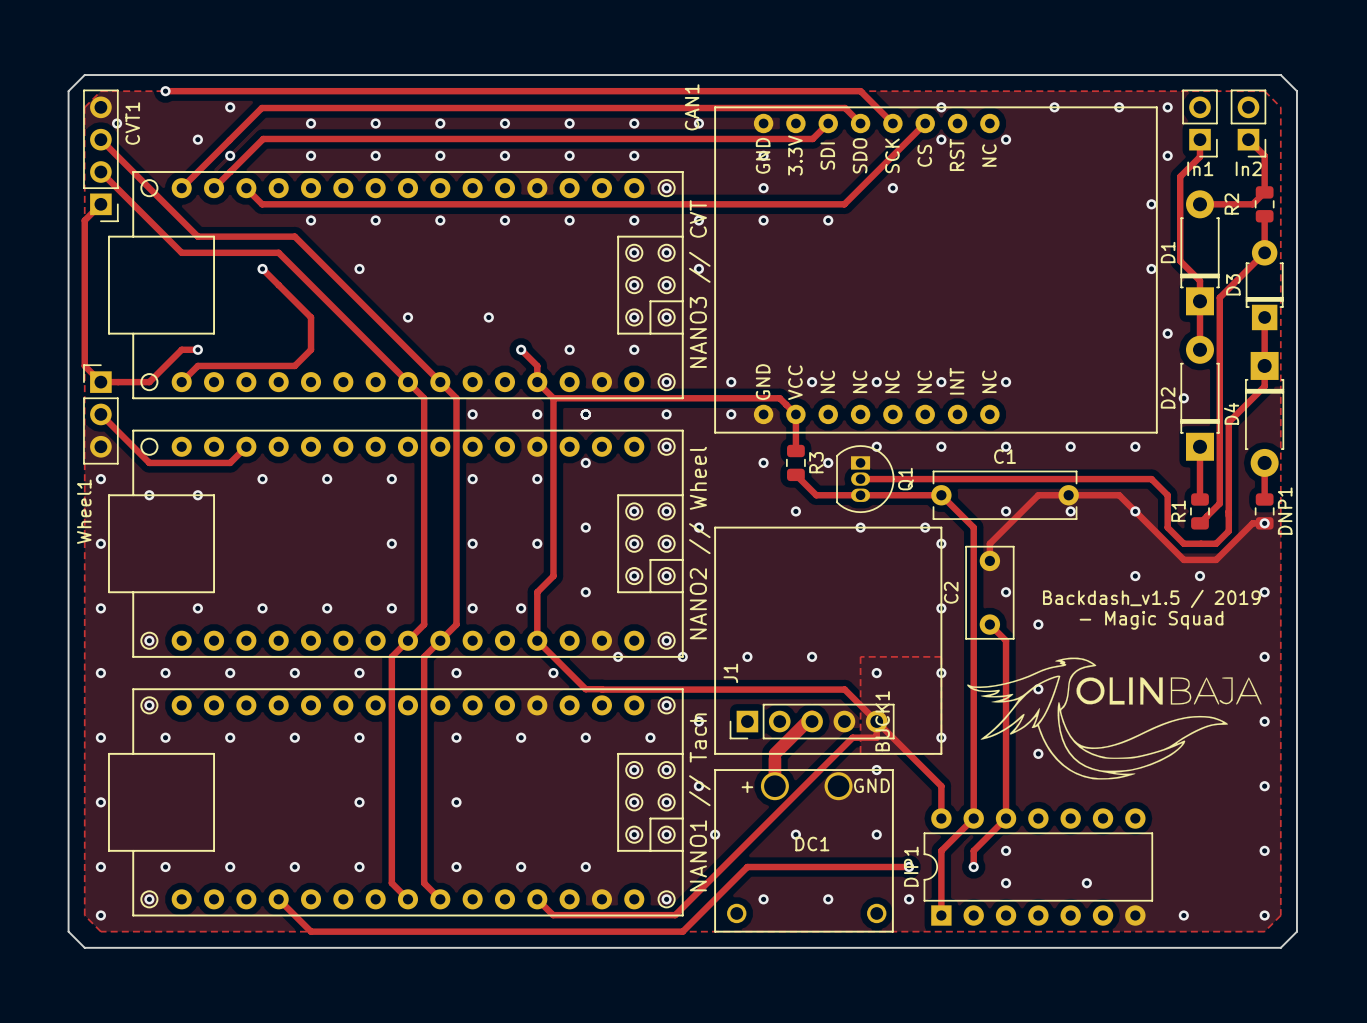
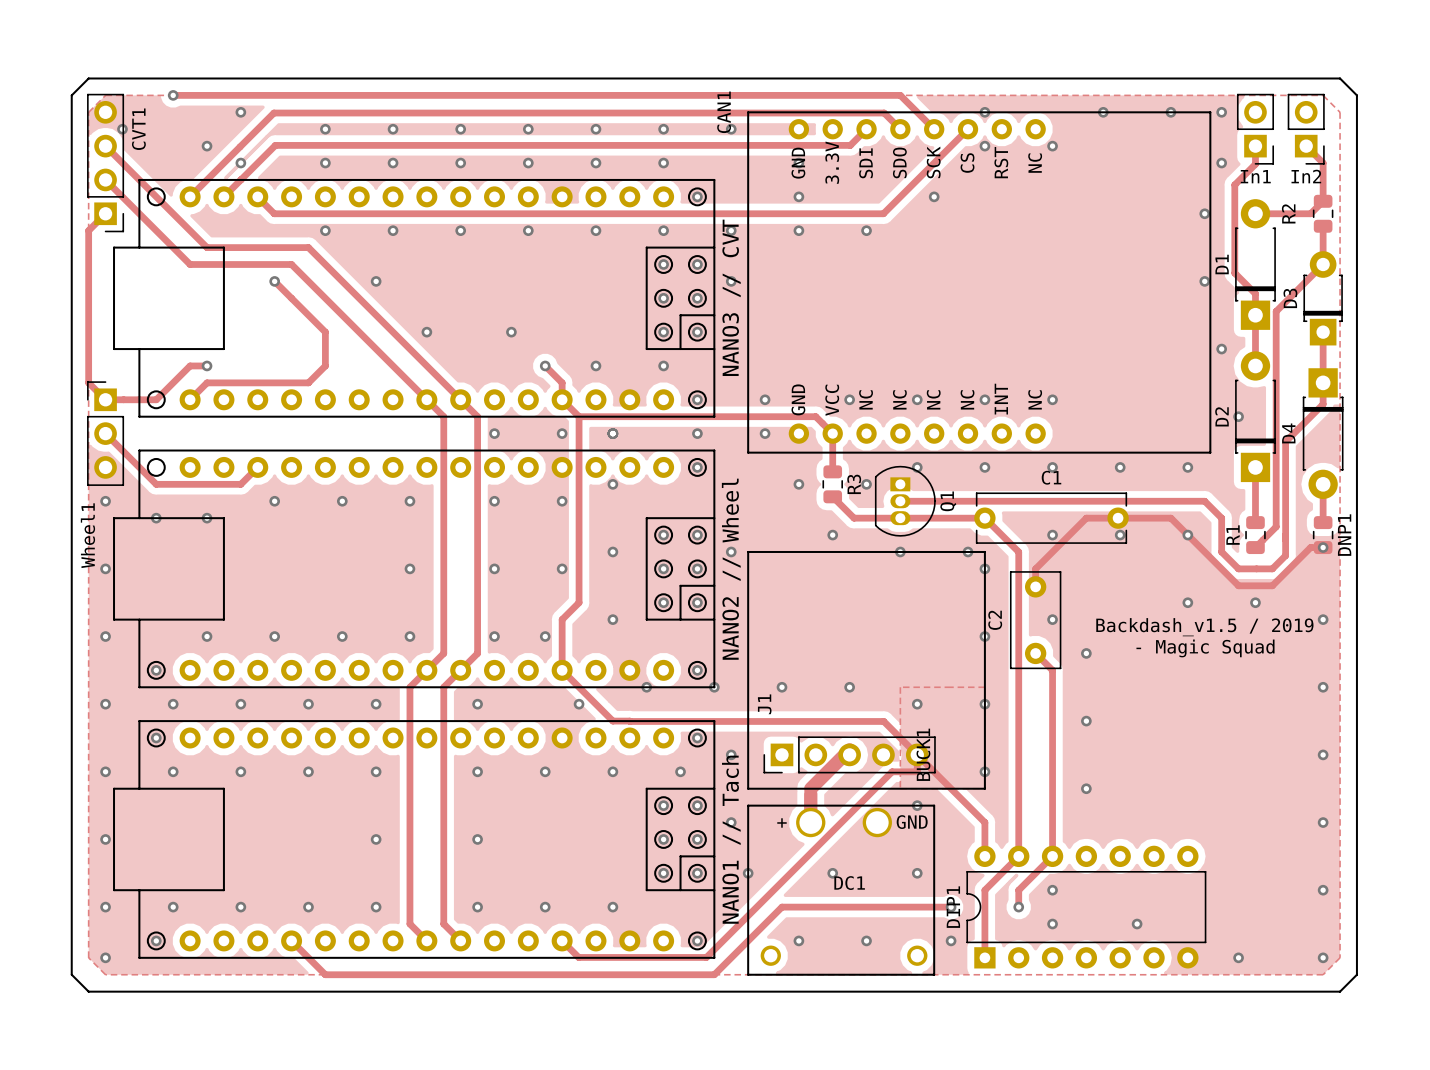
drawing: [967, 657, 1262, 780] -> none

